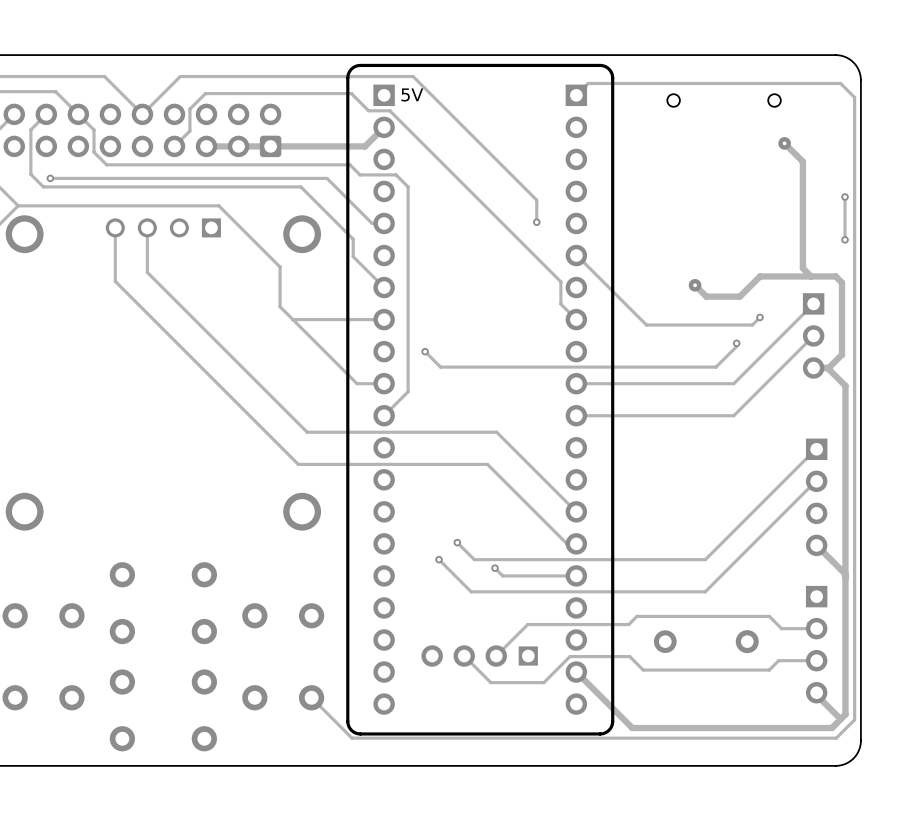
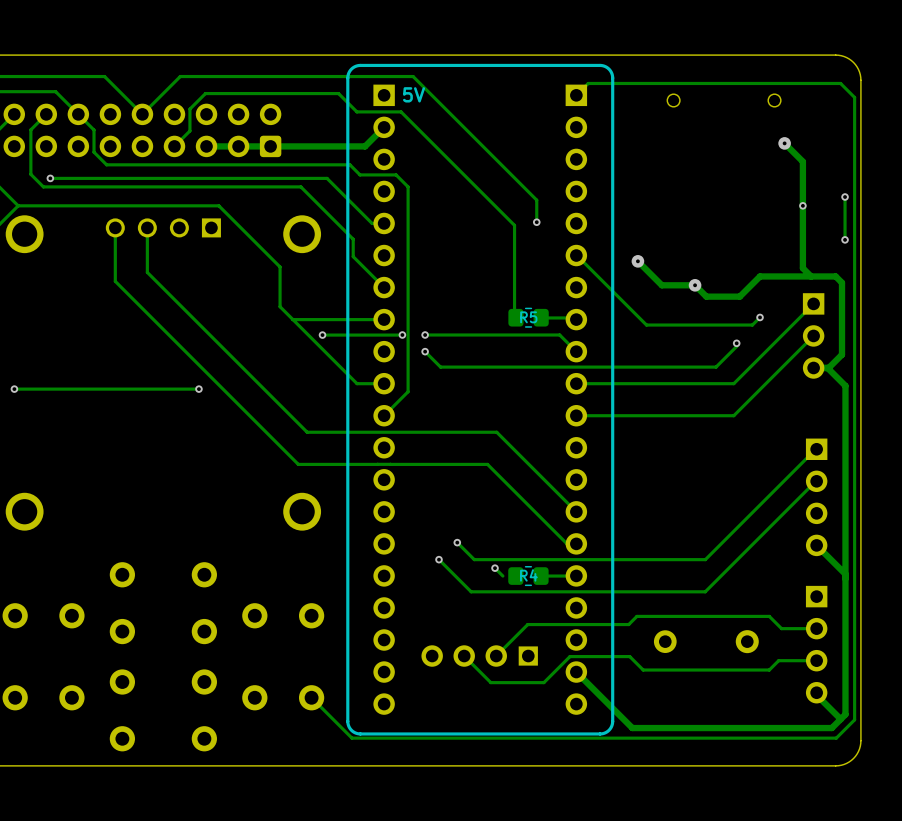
track: (338, 93) (351, 93) (368, 110) (389, 110) (560, 281) (560, 304) (574, 317) -> (338, 93) (356, 111) (401, 111) (514, 225) (514, 314) (518, 317)
via: none -> (802, 205)
track: none -> (637, 261) (661, 285) (695, 285)
via: none -> (637, 261)
R5: none -> (528, 317)
track: none -> (574, 317) (543, 317)
via: none -> (402, 334)
track: none -> (425, 334) (559, 334) (576, 351)
via: none -> (425, 334)
via: none -> (322, 335)
track: none -> (402, 335) (322, 335)
via: none -> (14, 389)
track: none -> (198, 389) (14, 389)
via: none -> (198, 389)
track: (576, 575) (502, 575) -> (576, 576) (541, 576)
R4: none -> (528, 576)

